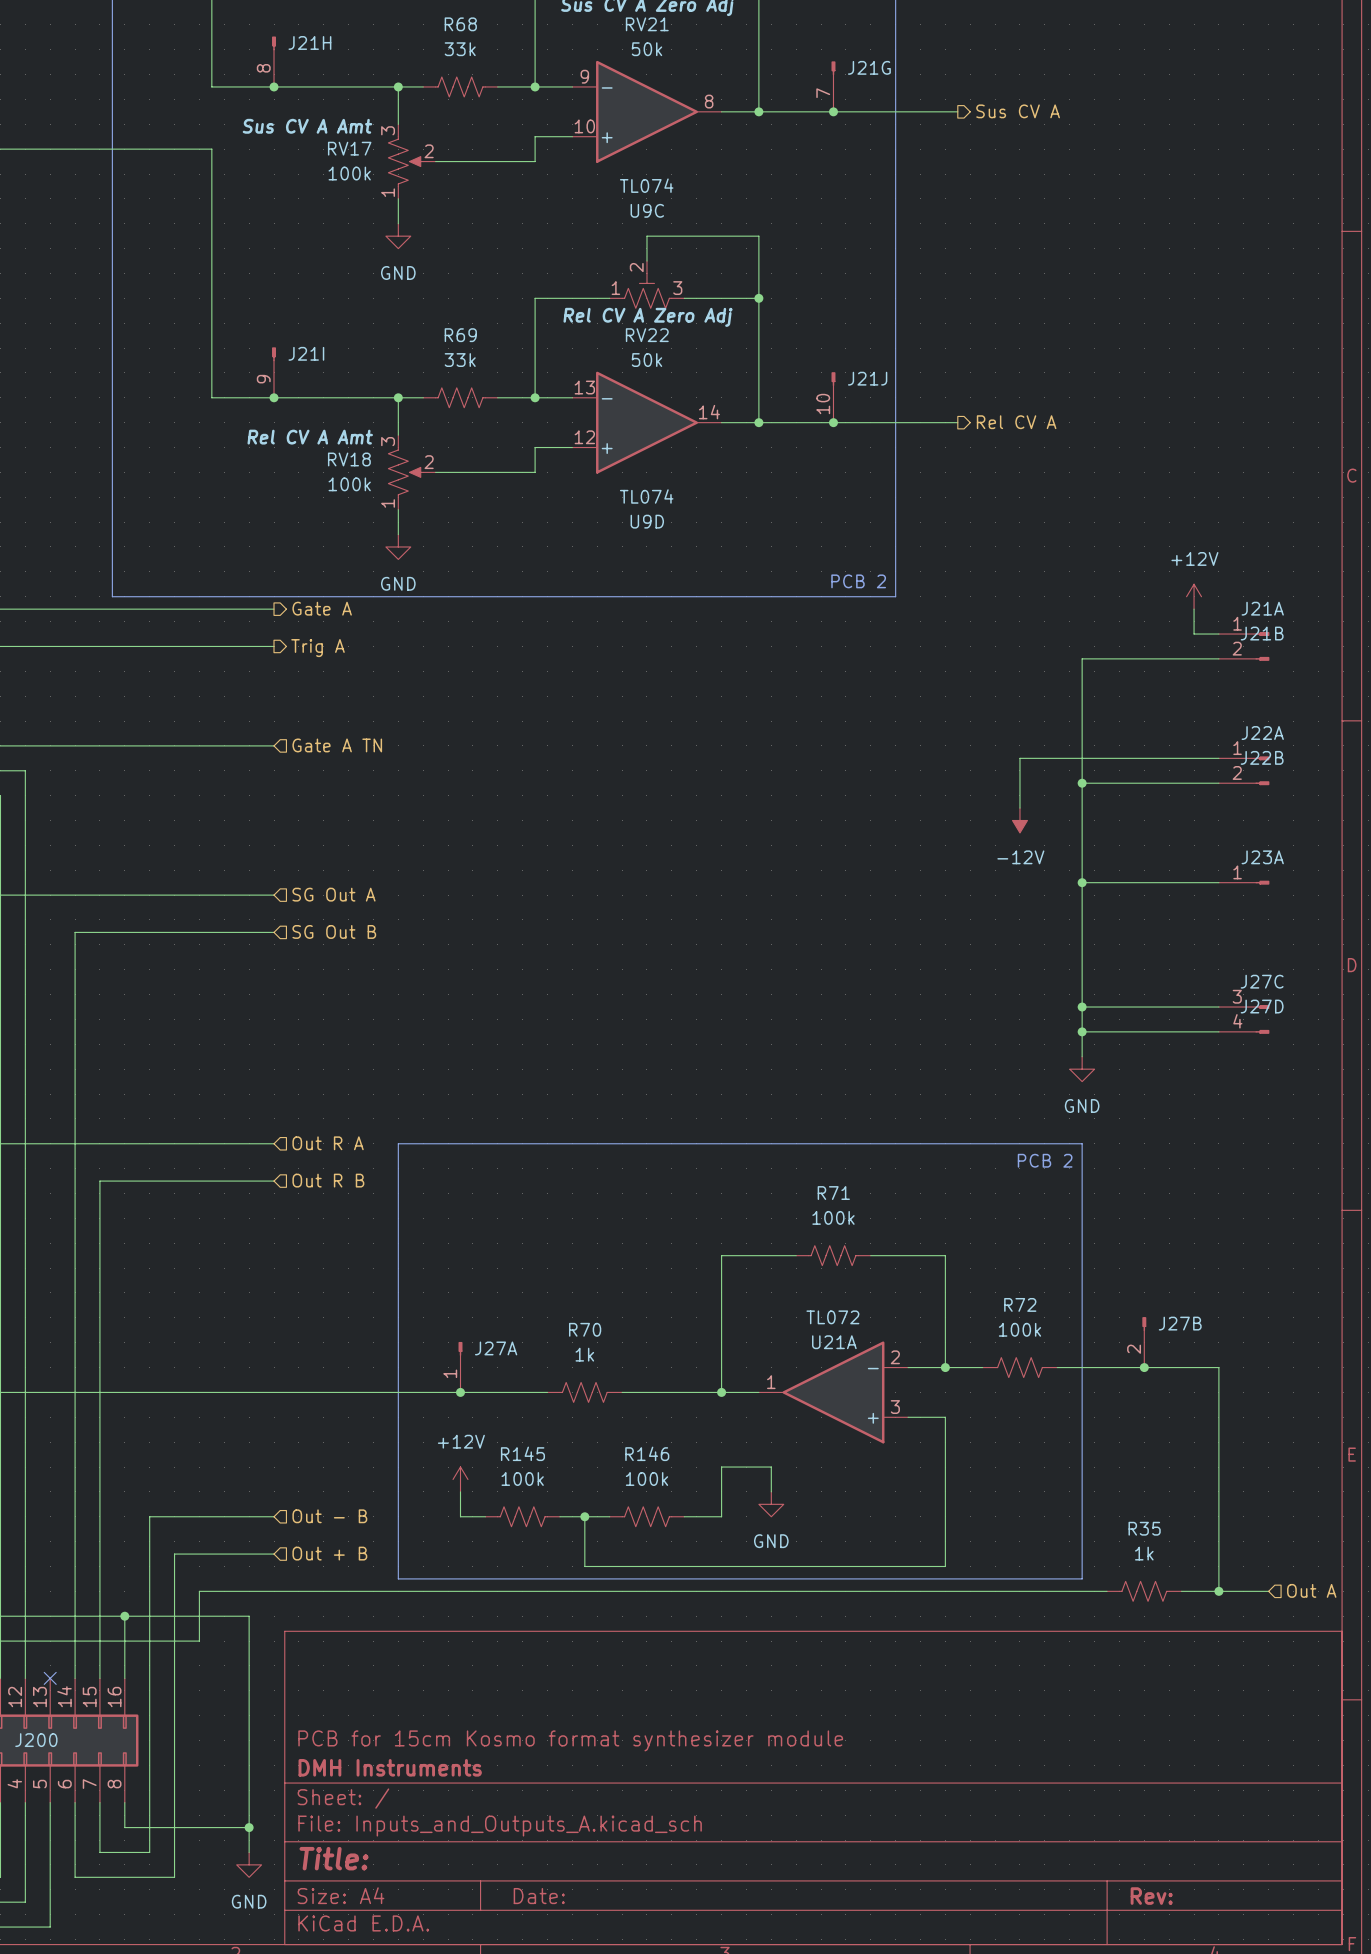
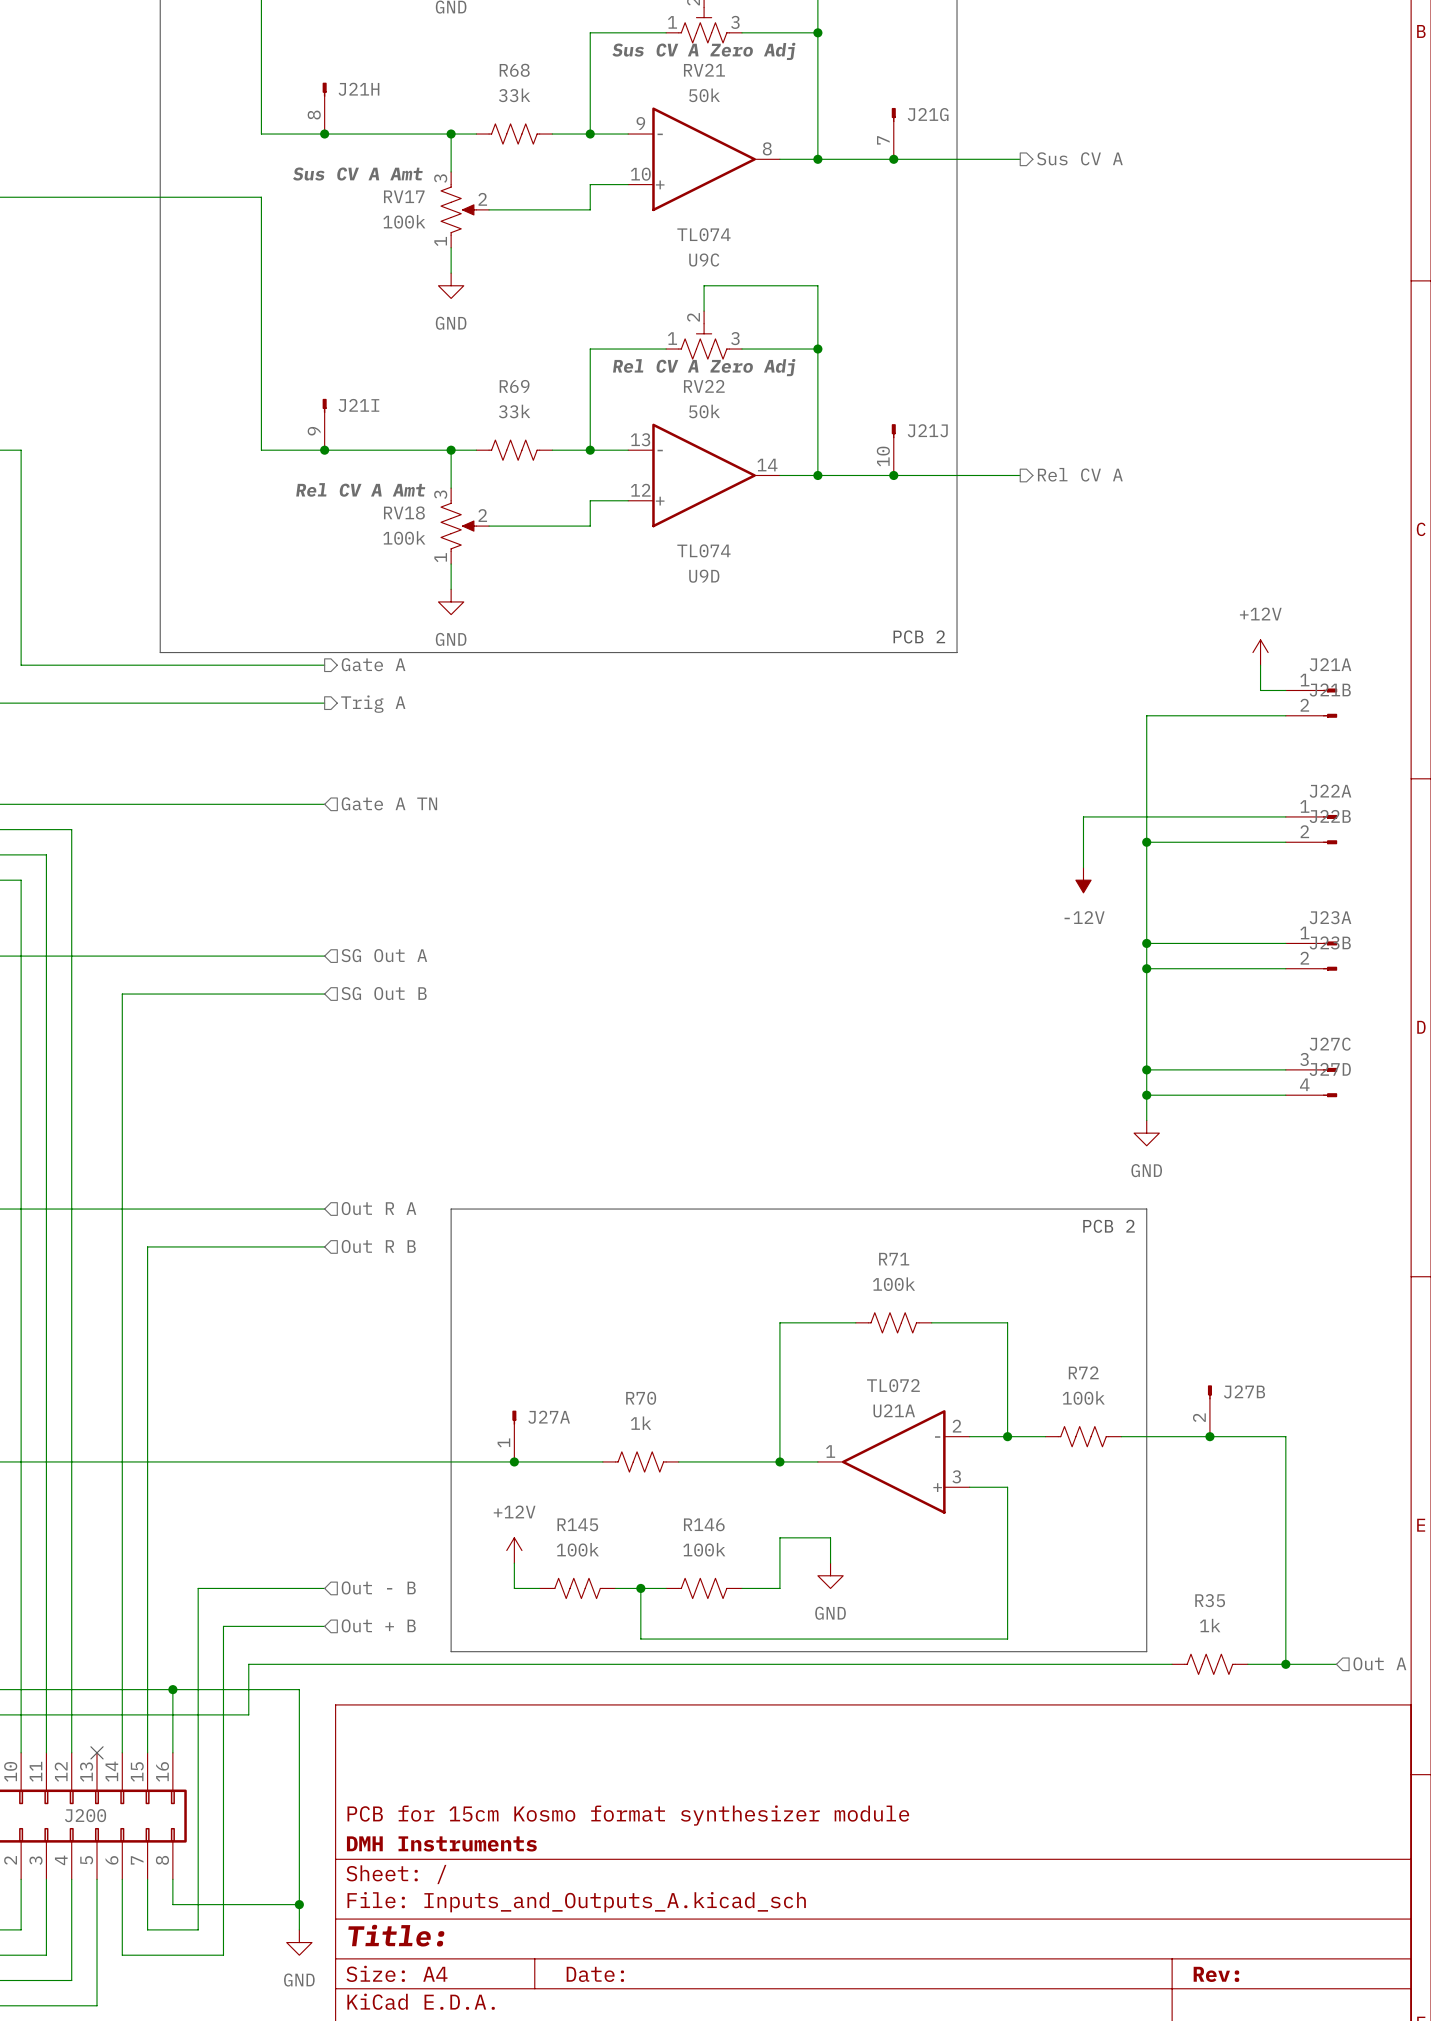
wire: none -> (1146, 968) (1285, 968)
junction: none -> (1146, 968)
J23B: none -> (1311, 968)

